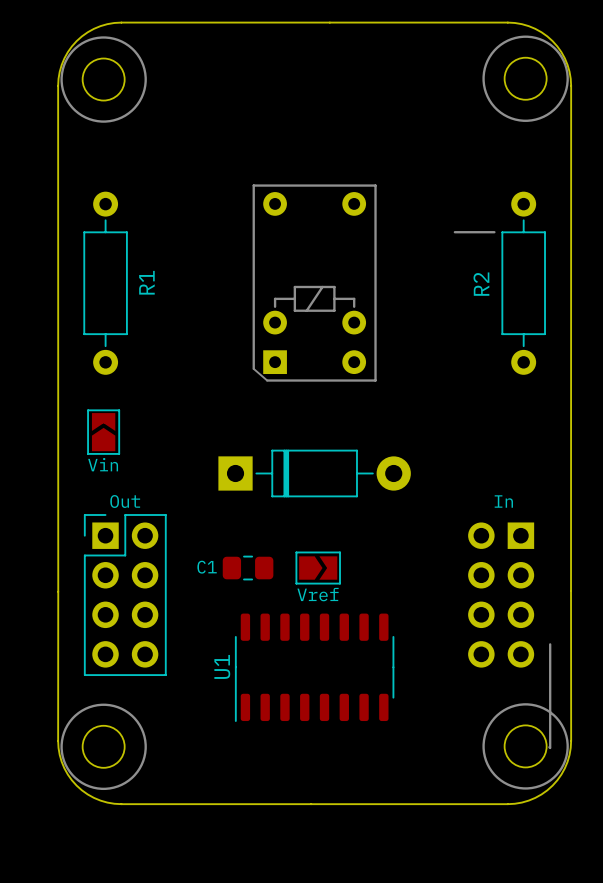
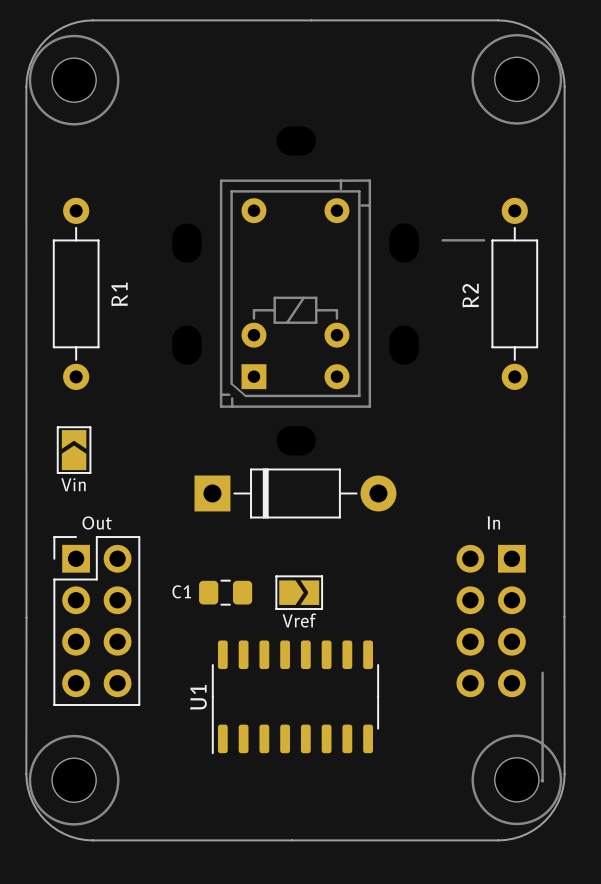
line: none -> (340, 180) (221, 180) (221, 406) (369, 406) (369, 180) (340, 180)
line: none -> (340, 180) (340, 188)
line: none -> (361, 205) (369, 205)
line: none -> (221, 394) (229, 394)
line: none -> (232, 398) (232, 406)

